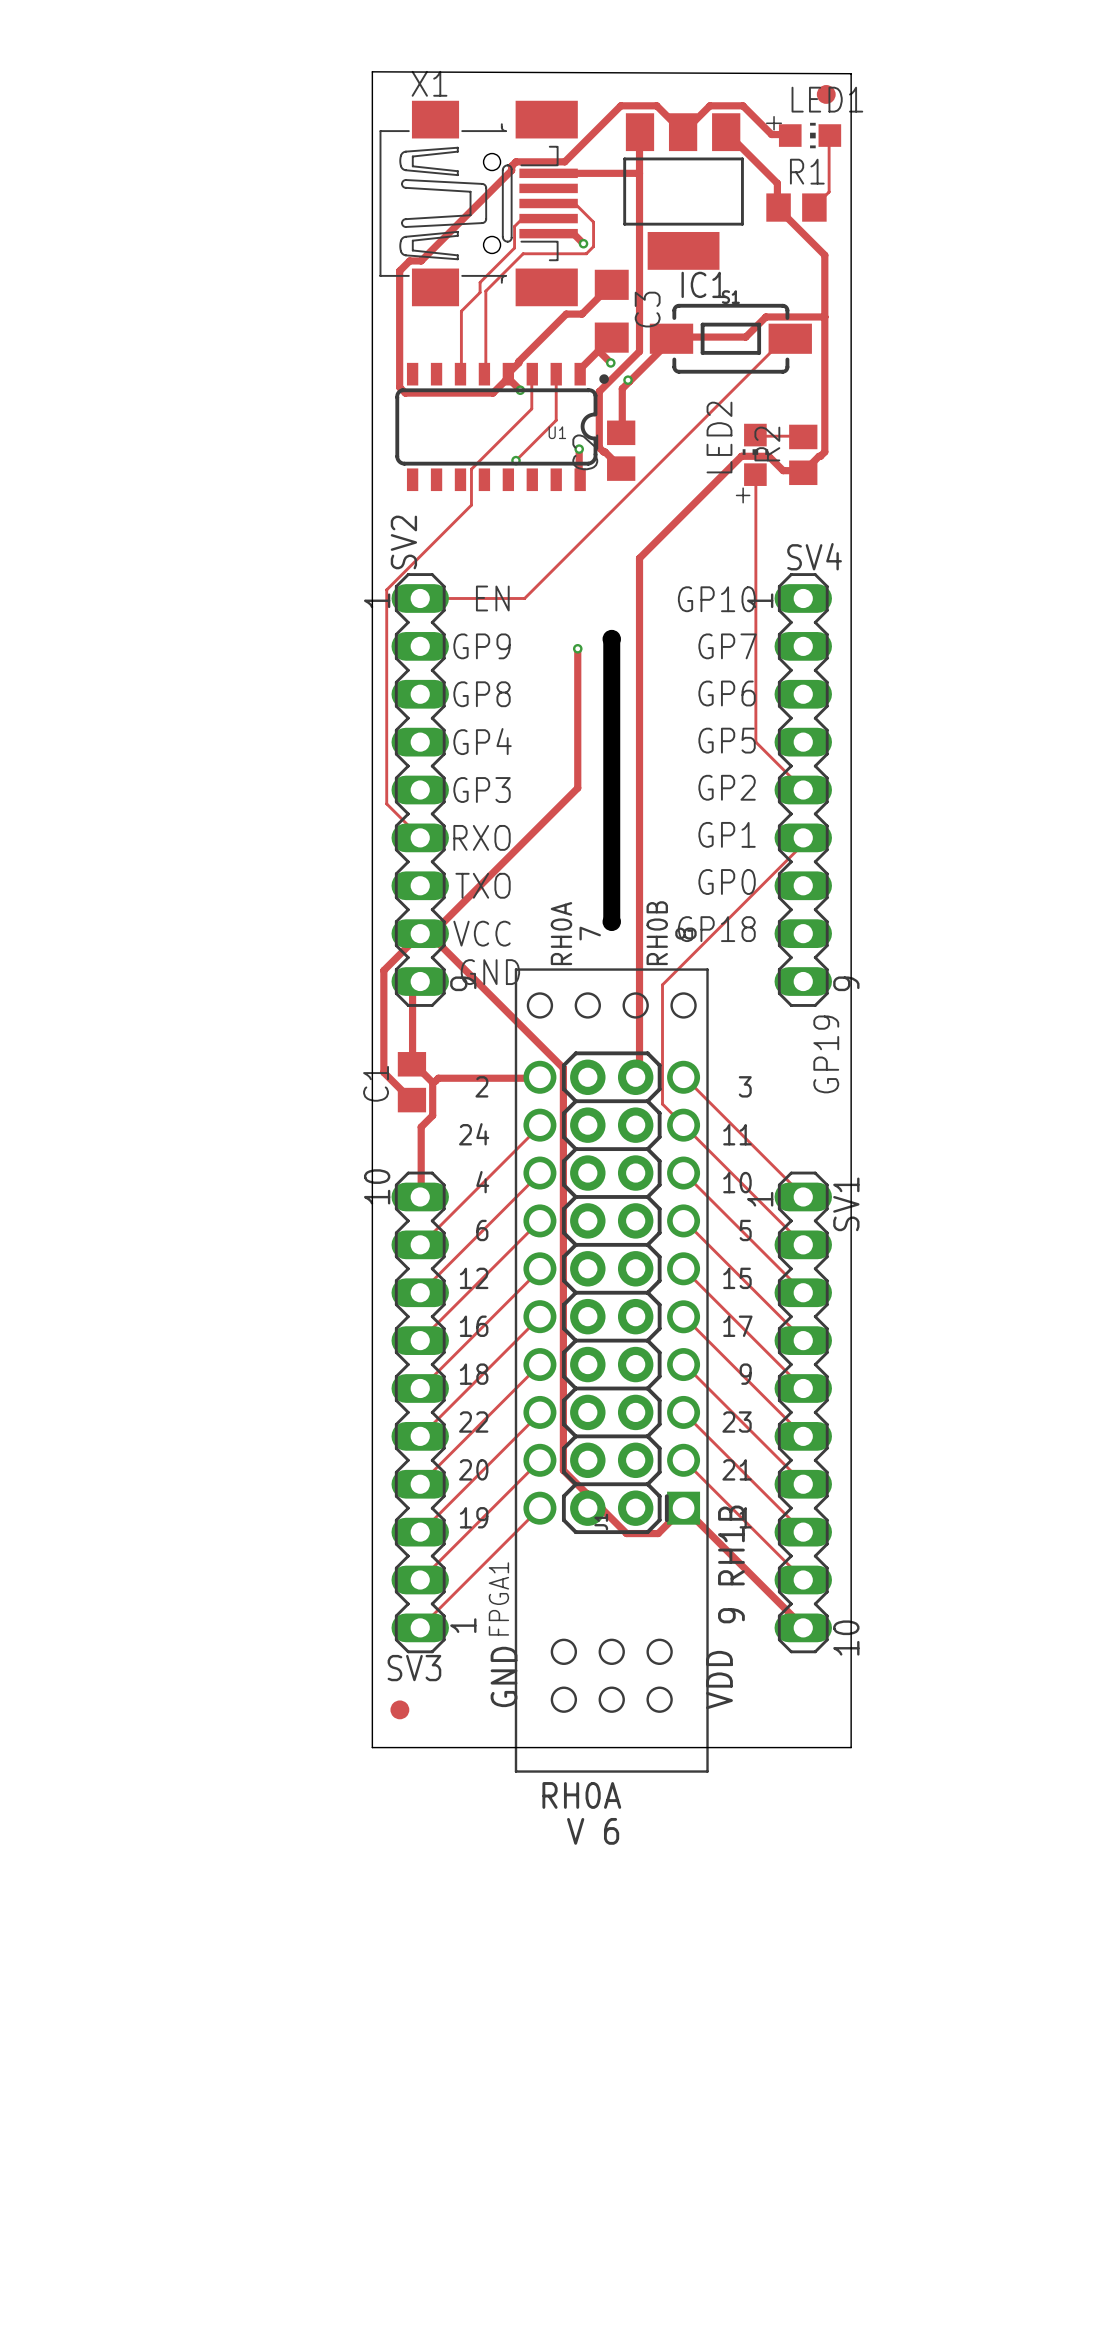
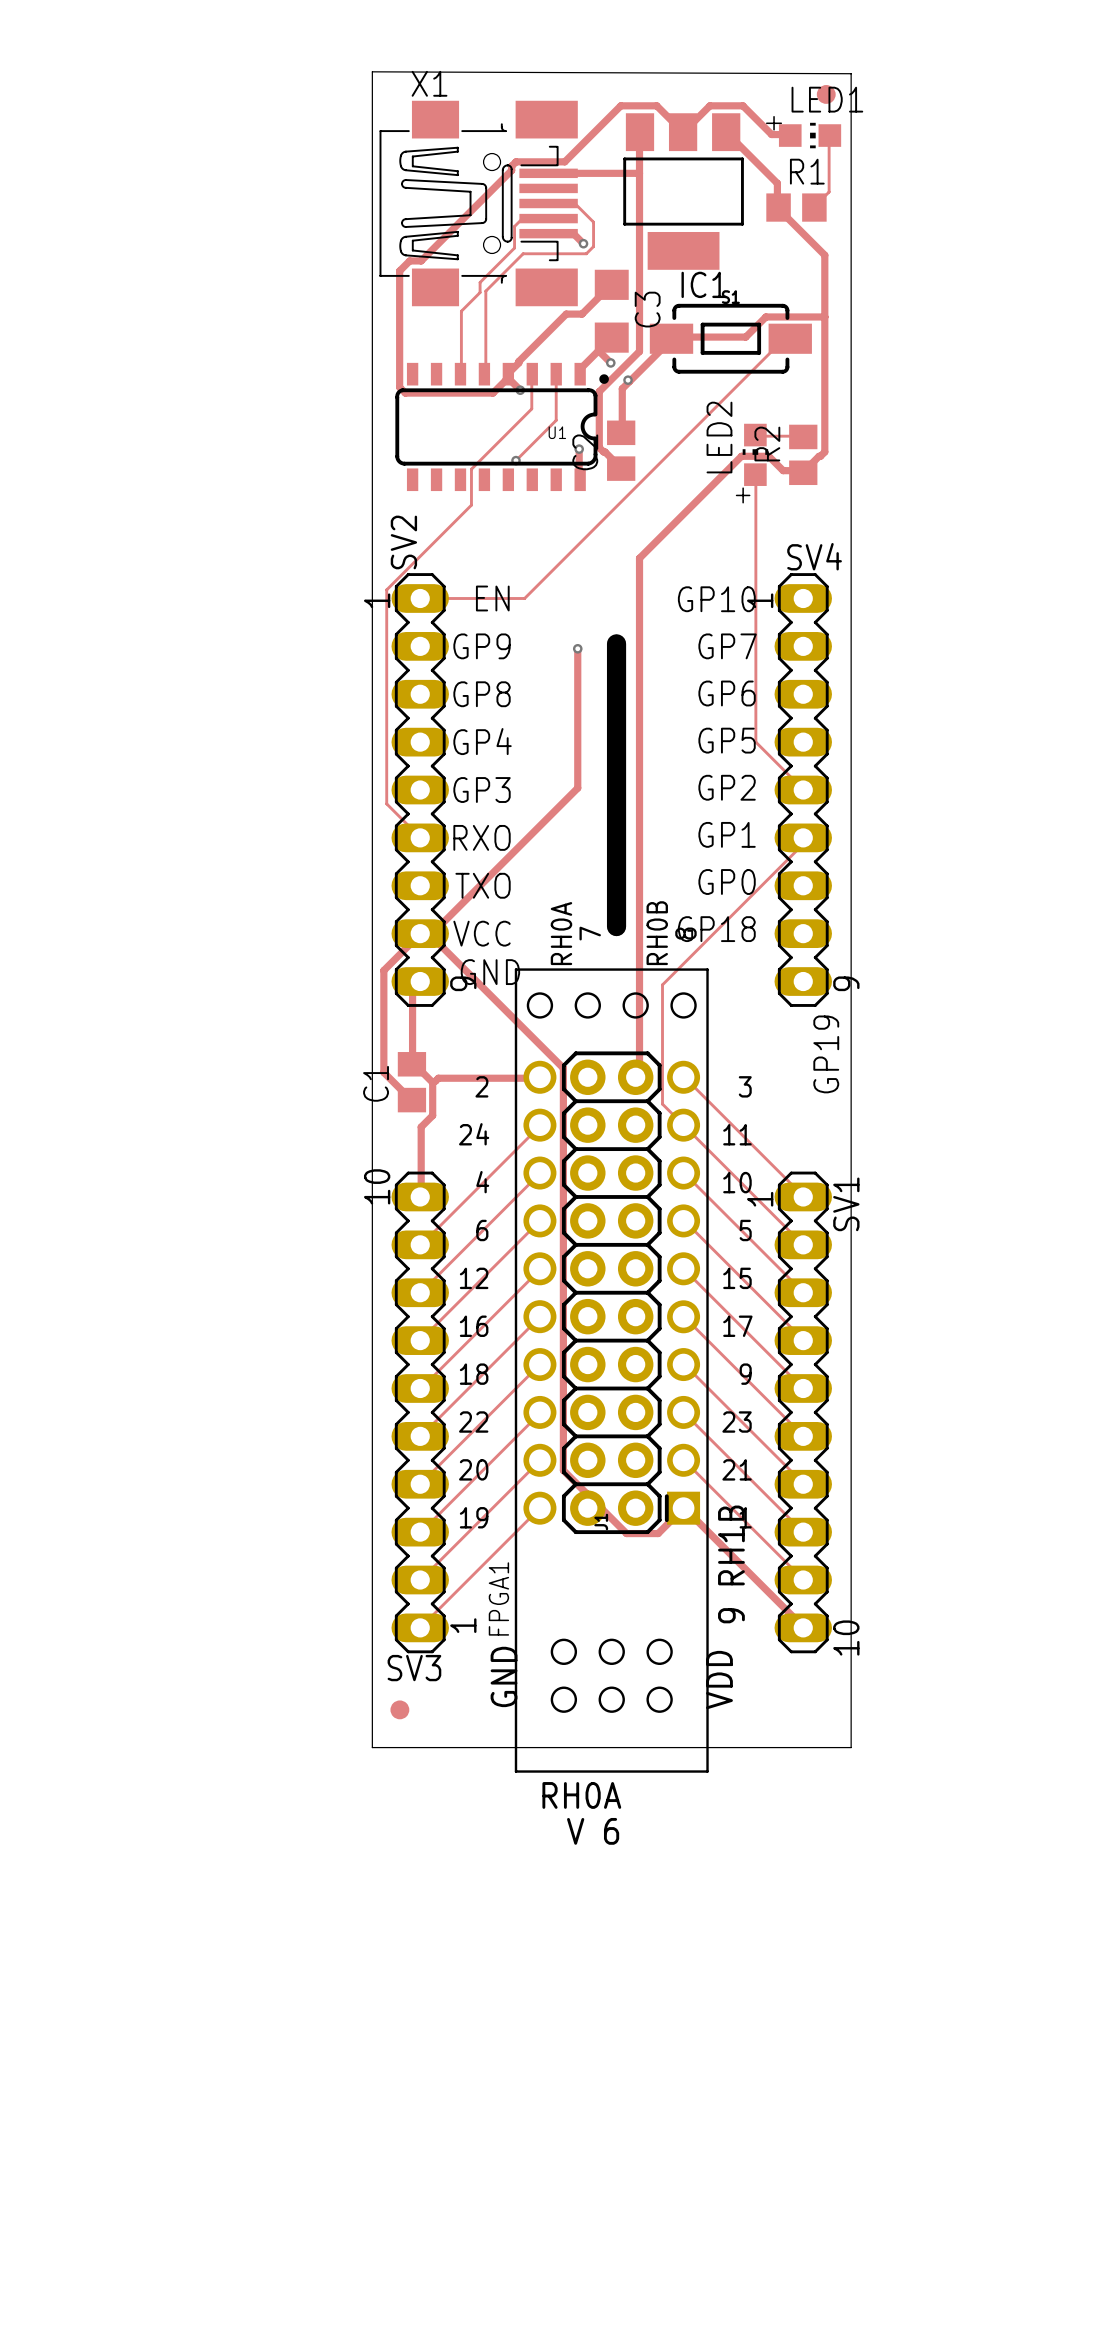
part footprint: [603, 630, 621, 931] -> [606, 634, 627, 937]

